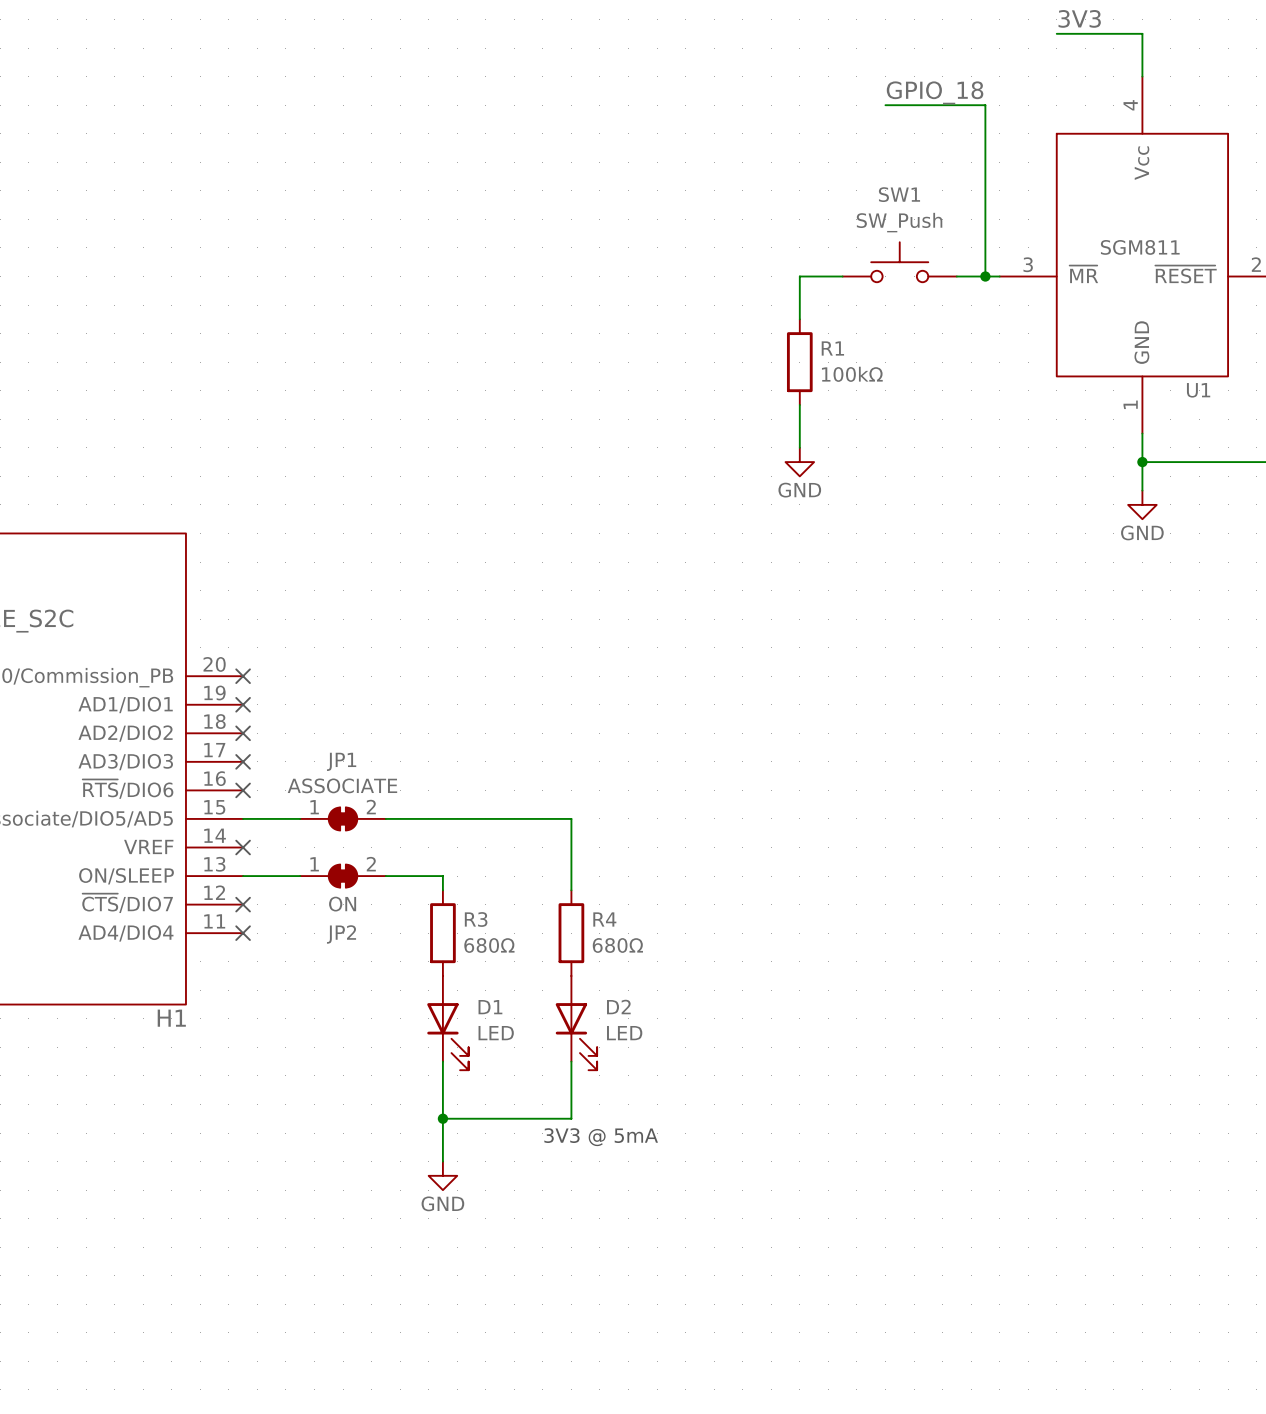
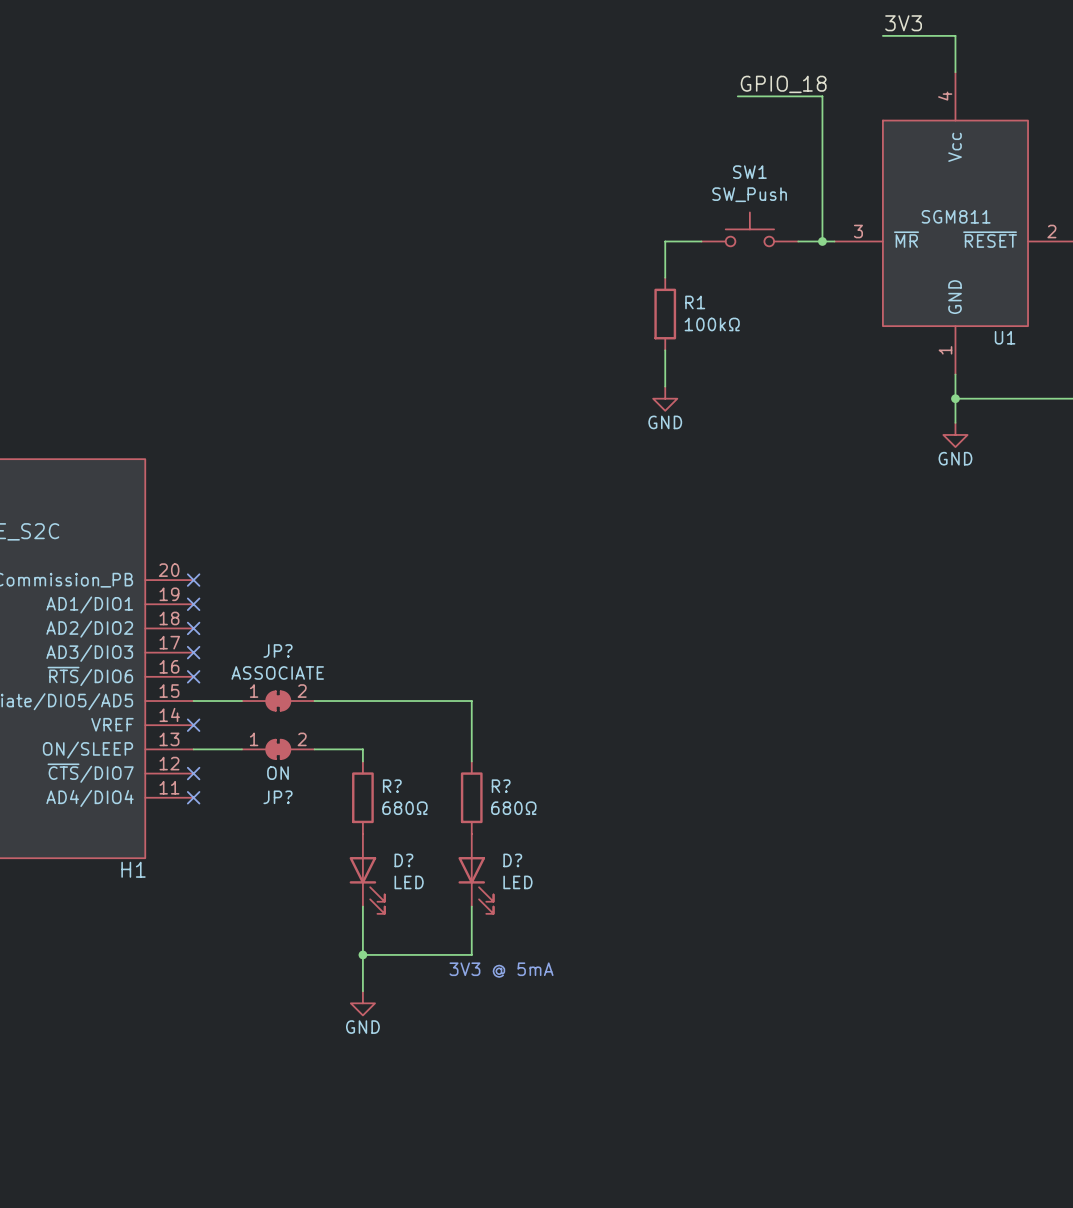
JP1 name: JP1 (341, 761) -> JP? (277, 650)
R3 name: R3 (476, 919) -> R? (392, 786)
R4 name: R4 (604, 919) -> R? (501, 786)
JP2 name: JP2 (341, 934) -> JP? (277, 797)
D1 name: D1 (490, 1007) -> D? (403, 860)
D2 name: D2 (618, 1007) -> D? (512, 860)

